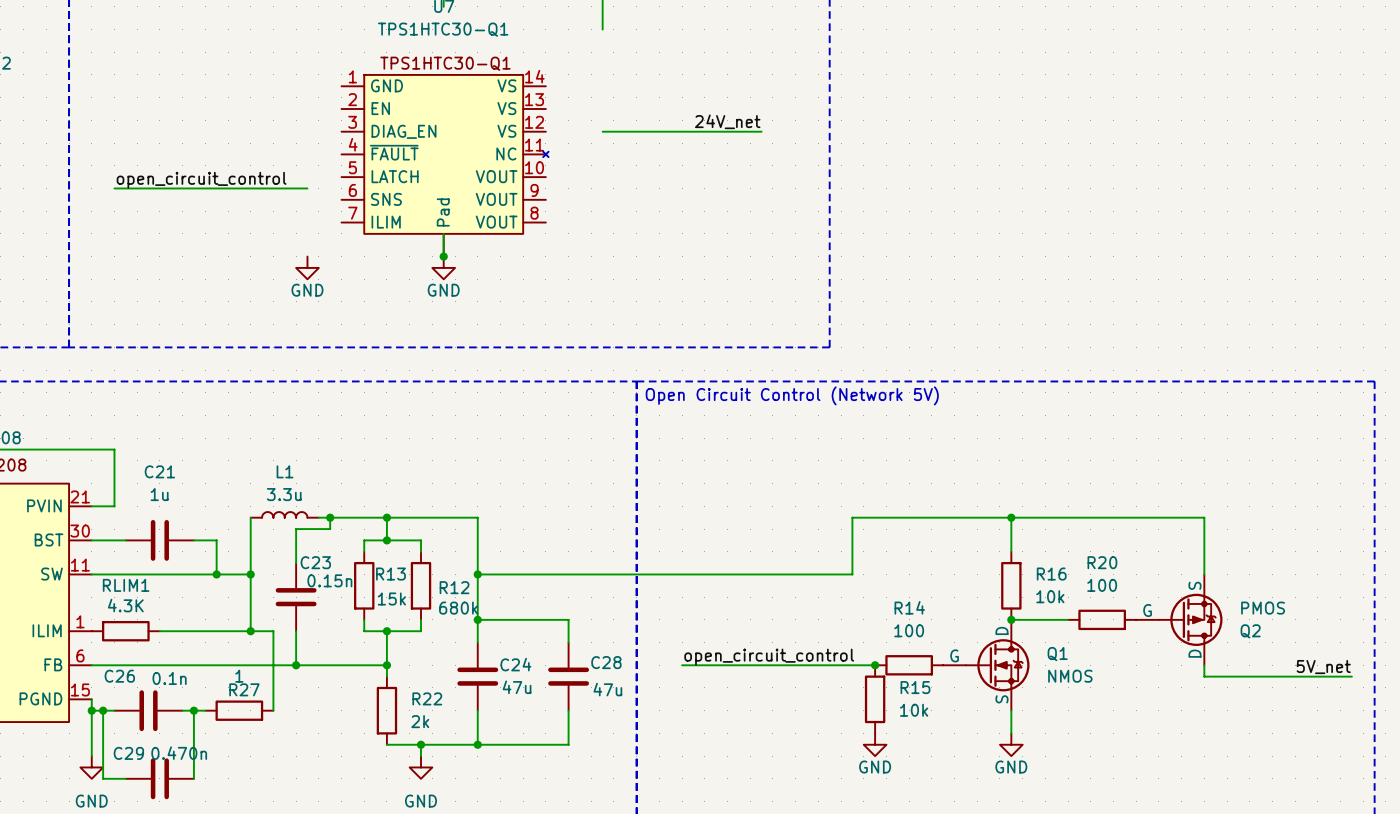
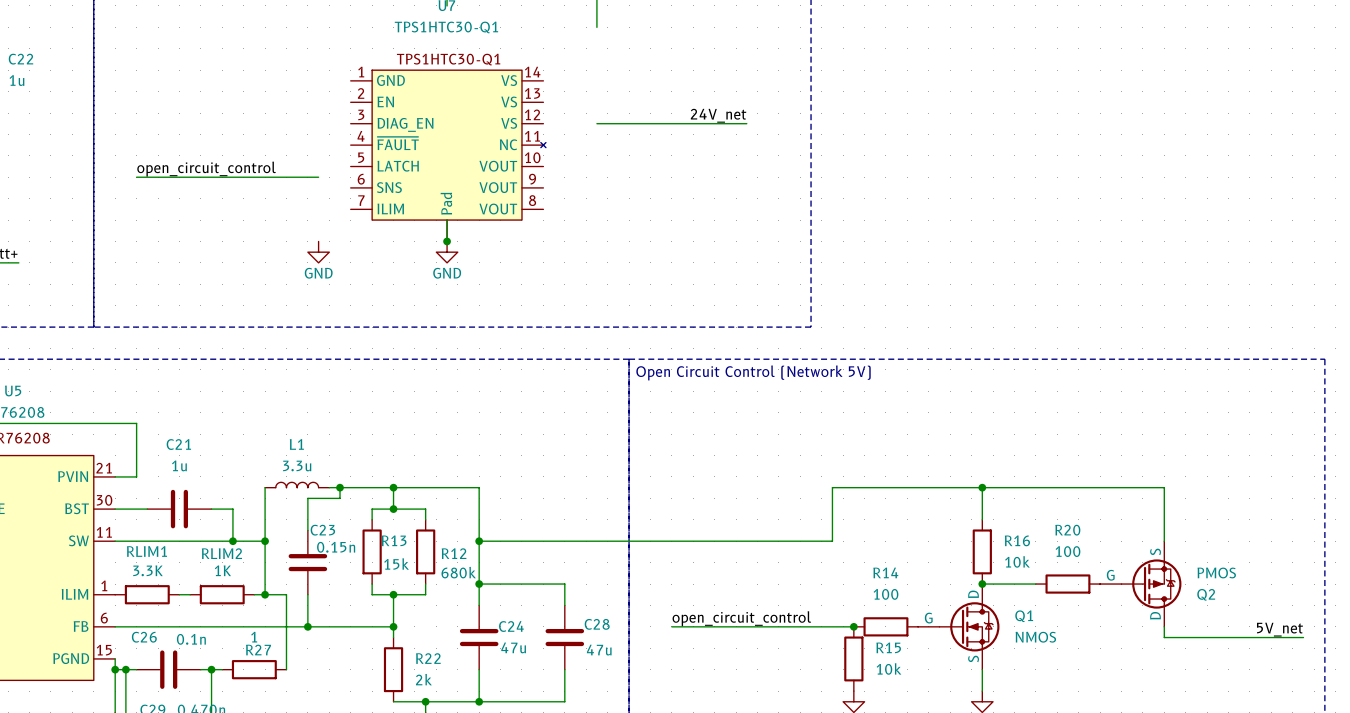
RLIM1 value: 4.3K (125, 605) -> 3.3K (147, 570)
wire: (171, 631) (239, 631) -> none
RLIM2: none -> 1K (222, 594)

